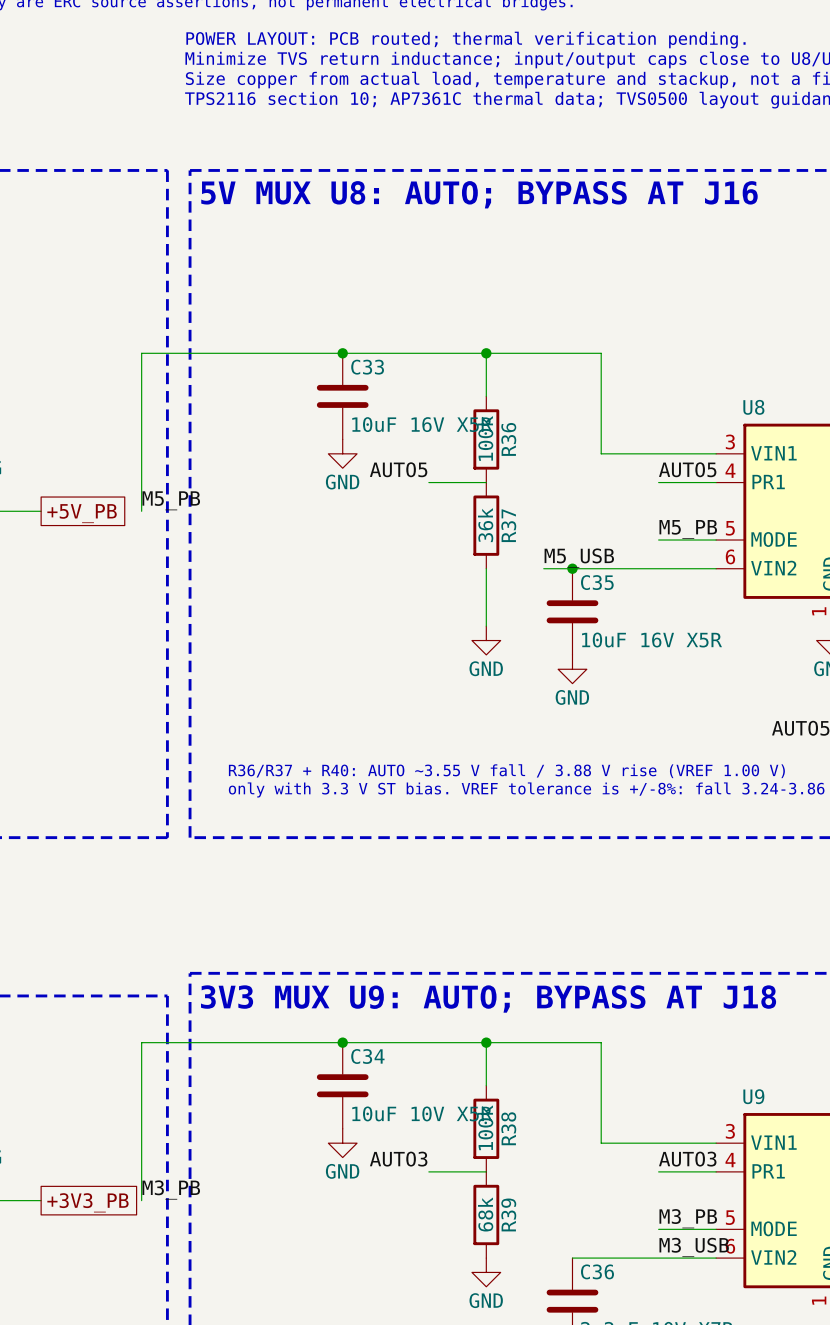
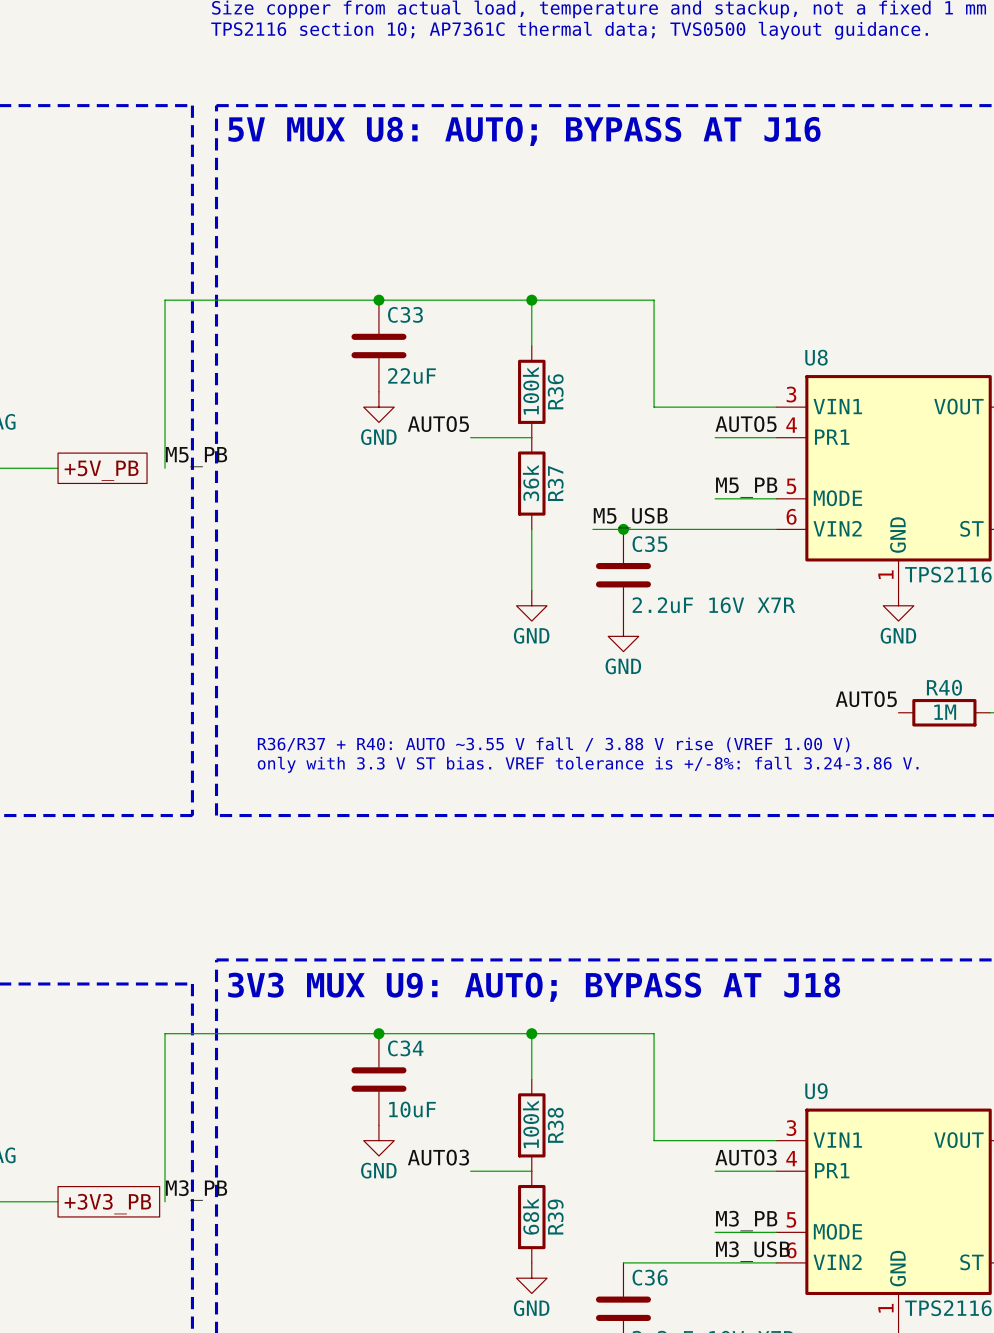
C33 value: 10uF 16V X5R (422, 424) -> 22uF (412, 376)
C35 value: 10uF 16V X5R (652, 640) -> 2.2uF 16V X7R (713, 605)
C34 value: 10uF 10V X5R (422, 1113) -> 10uF (412, 1109)

